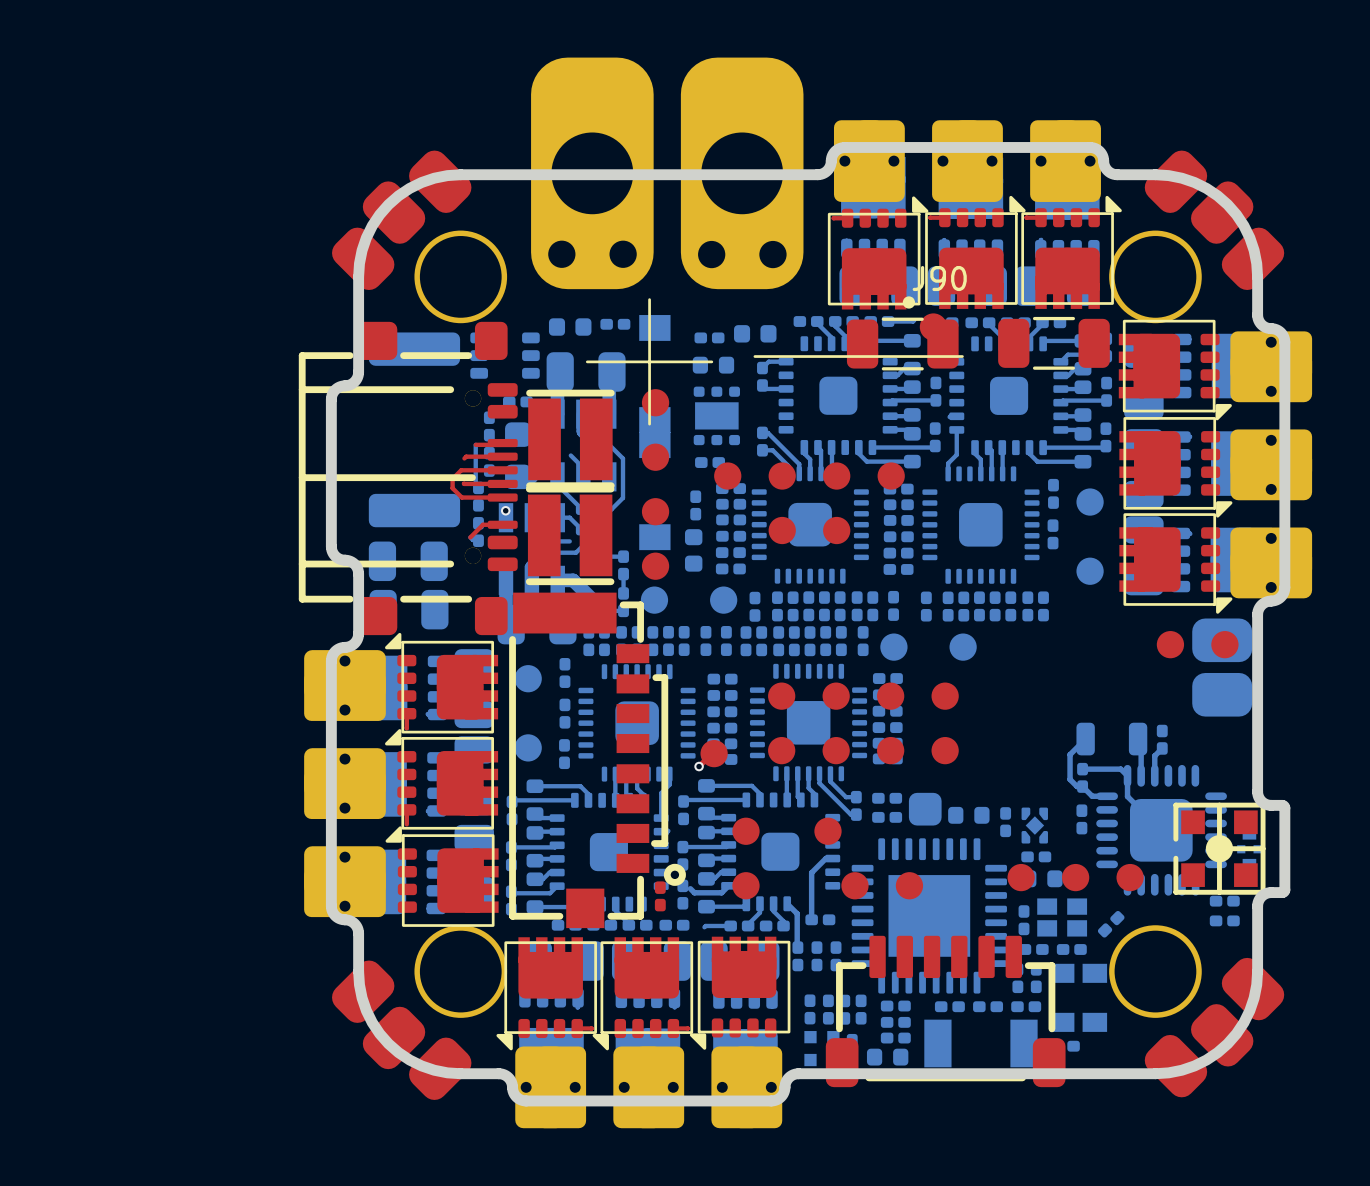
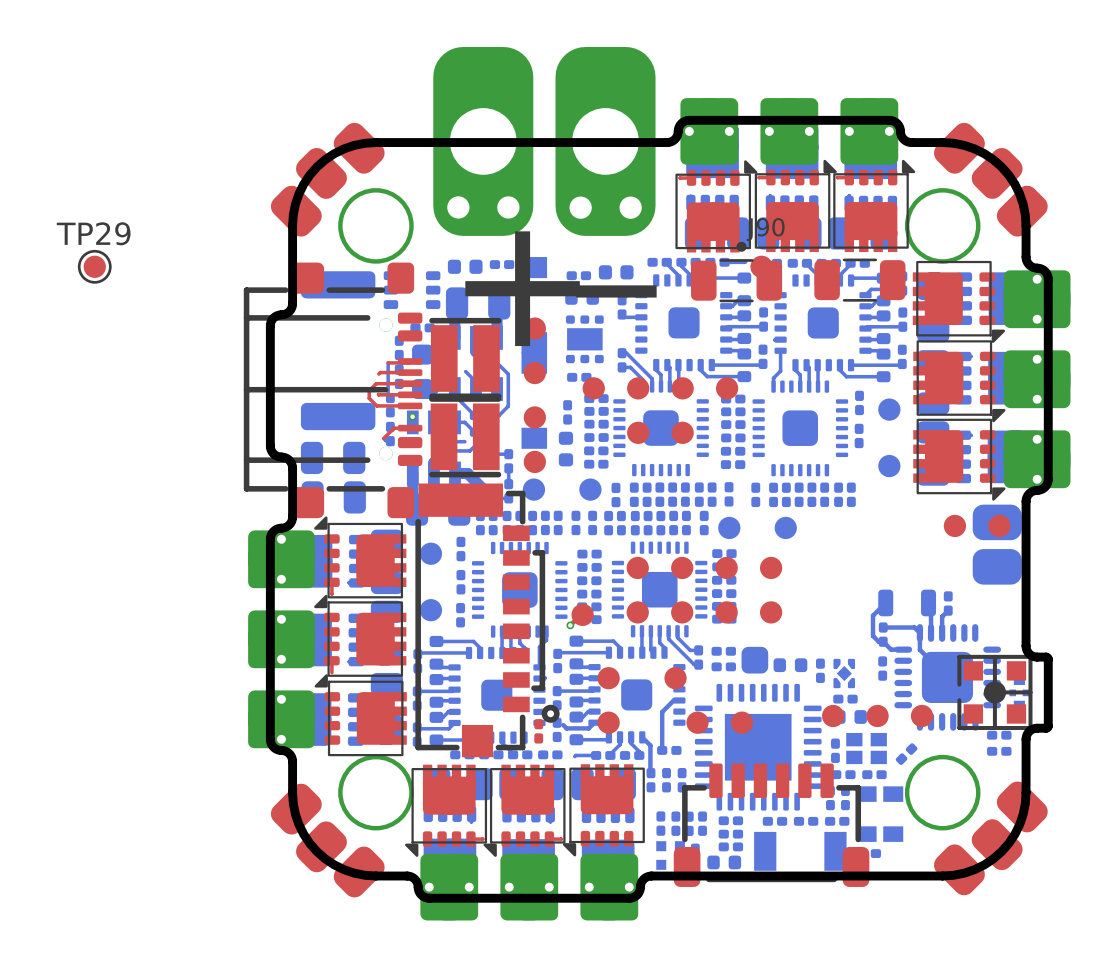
TP29: none -> (94, 266)

